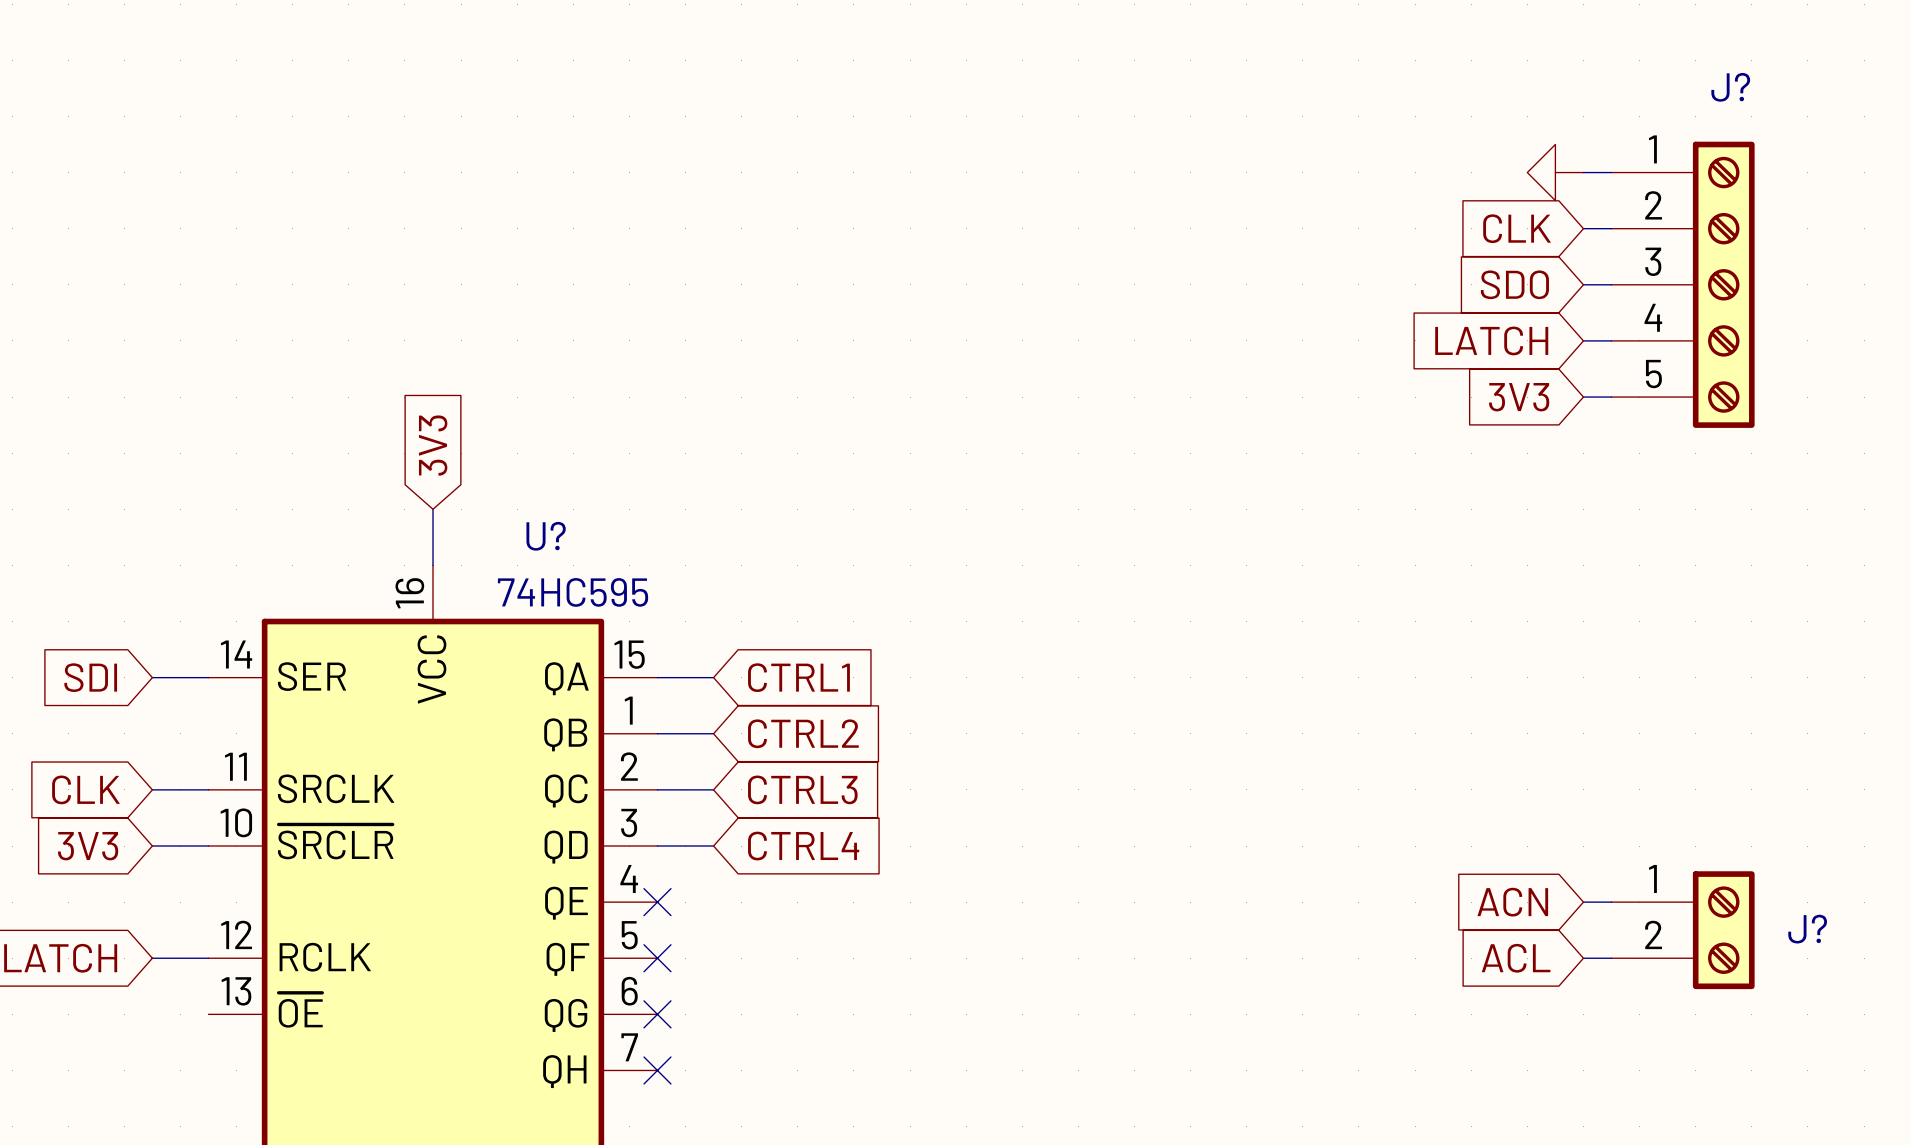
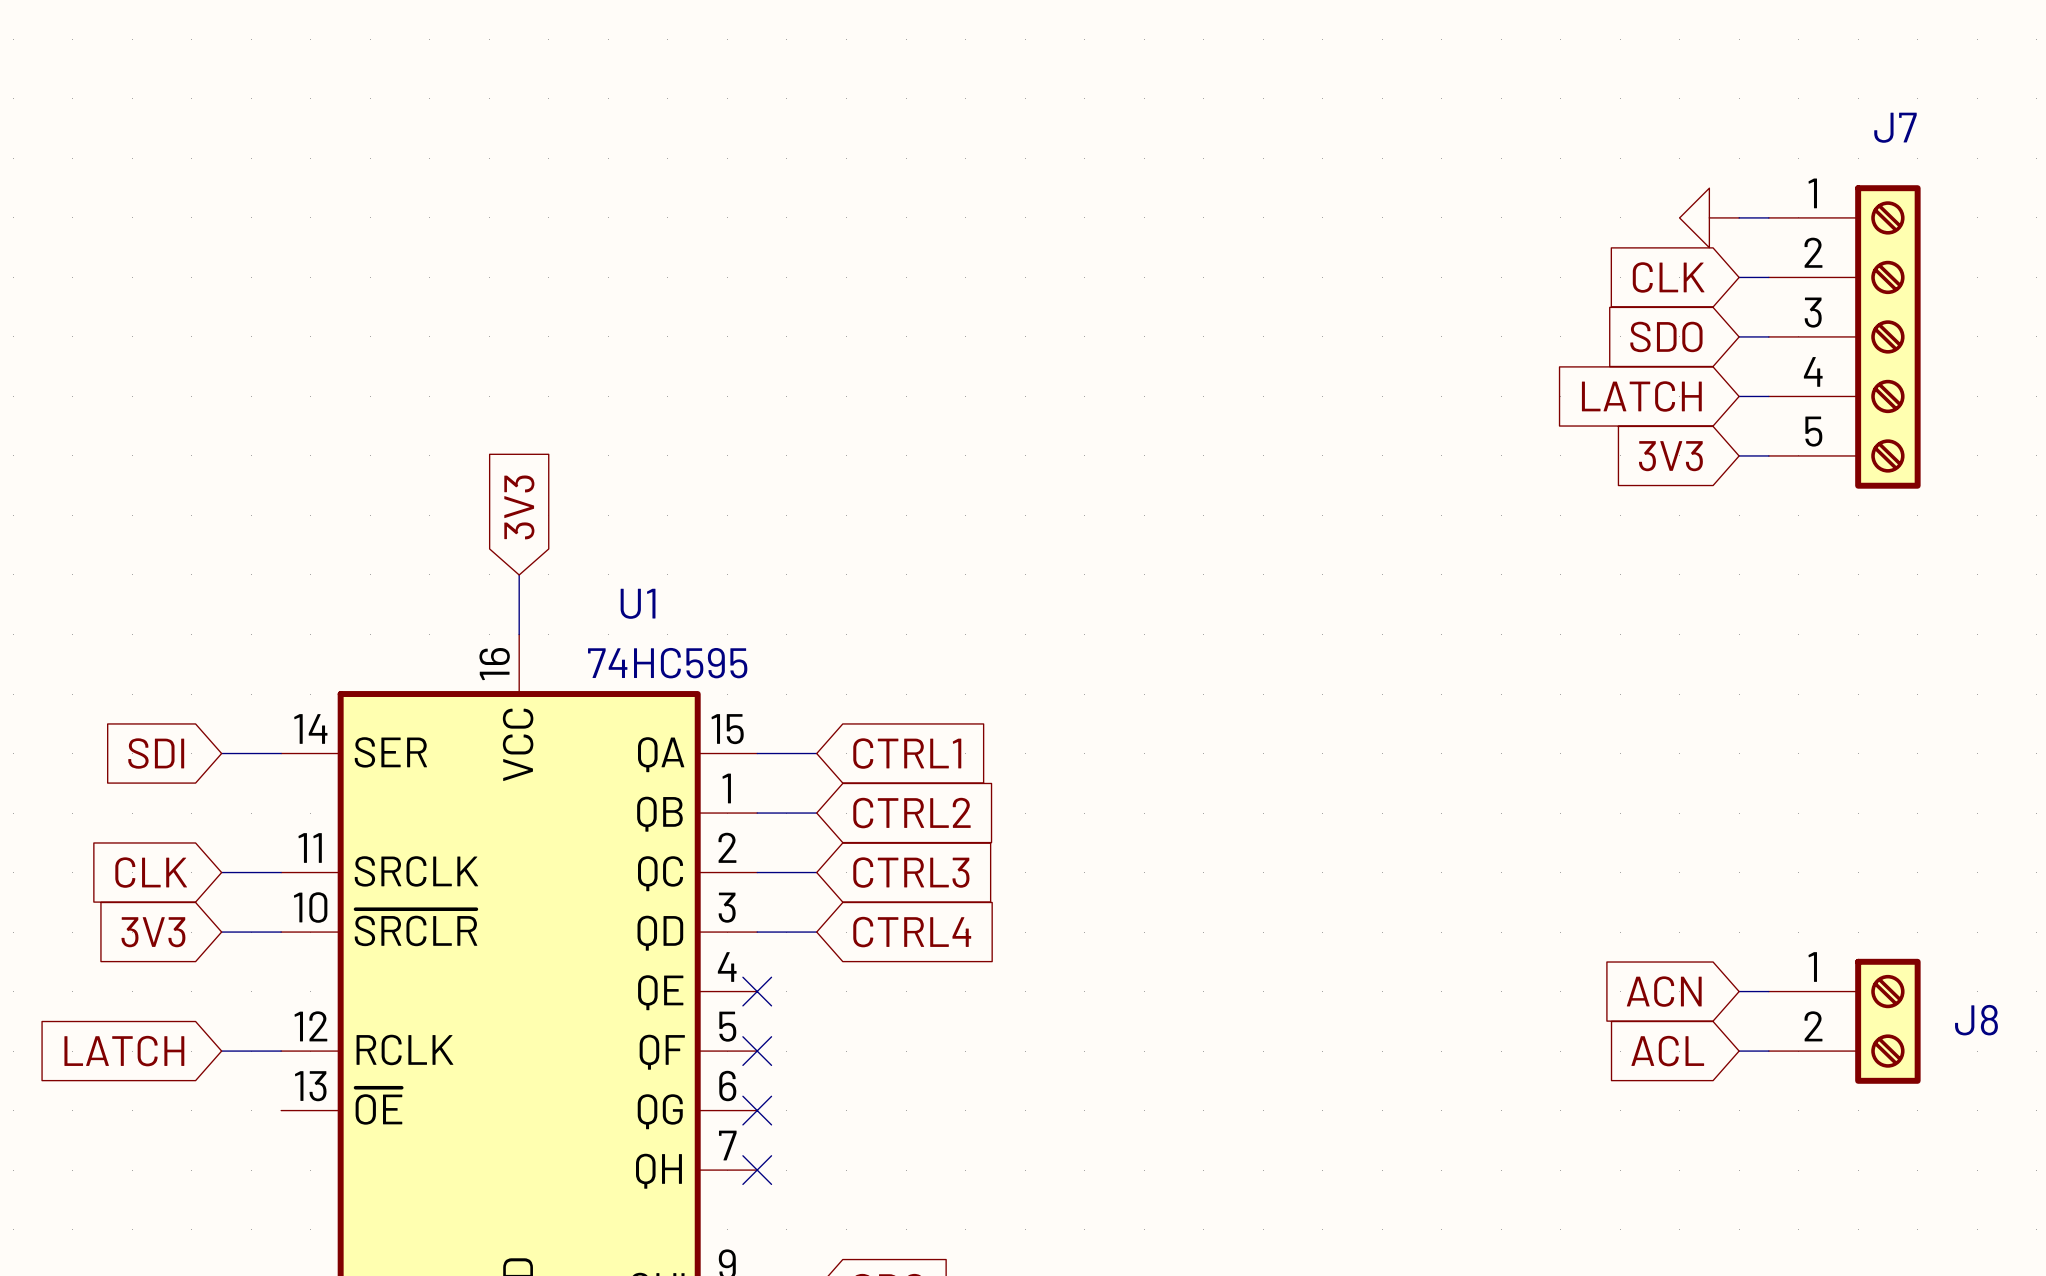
J? name: J? (1730, 87) -> J7 (1895, 127)
U? name: U? (546, 536) -> U1 (638, 603)
J? name: J? (1807, 929) -> J8 (1976, 1020)

